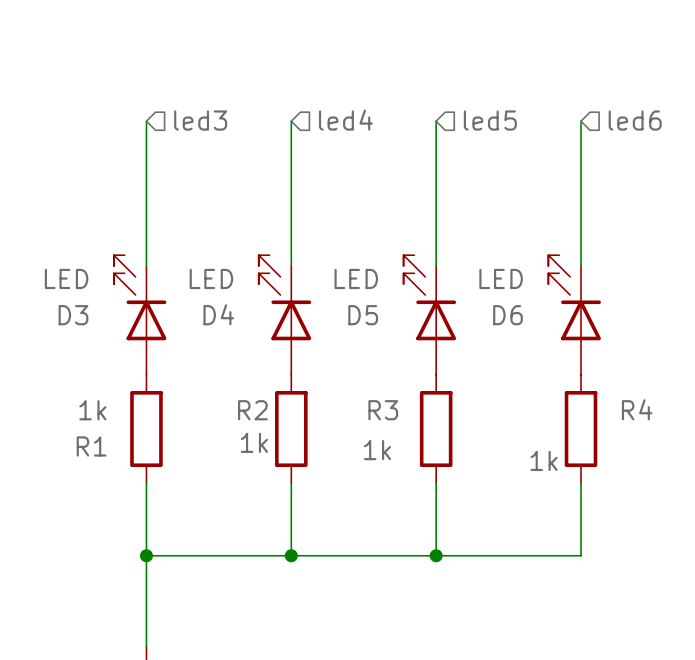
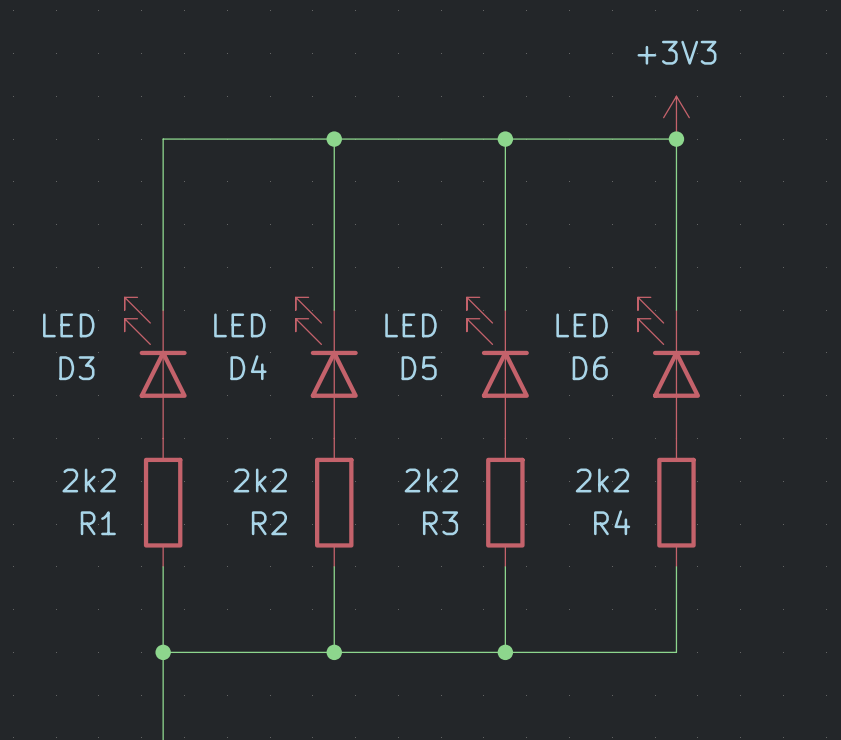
power symbol: none -> +3V3 (676, 117)
hierarchical label: led3 (200, 120) -> none
hierarchical label: led4 (345, 120) -> none
hierarchical label: led5 (490, 120) -> none
hierarchical label: led6 (635, 120) -> none
wire: none -> (163, 139) (676, 139)
junction: none -> (334, 139)
junction: none -> (505, 139)
junction: none -> (676, 139)
R4 name position: R4 (637, 409) -> R4 (612, 522)
R1 value: 1k (92, 410) -> 2k2 (89, 480)
R2 name position: R2 (252, 410) -> R2 (269, 523)
R3 name position: R3 (383, 410) -> R3 (440, 523)
R2 value: 1k (254, 442) -> 2k2 (260, 480)
R3 value: 1k (377, 450) -> 2k2 (431, 480)
R4 value: 1k (544, 460) -> 2k2 (602, 480)

